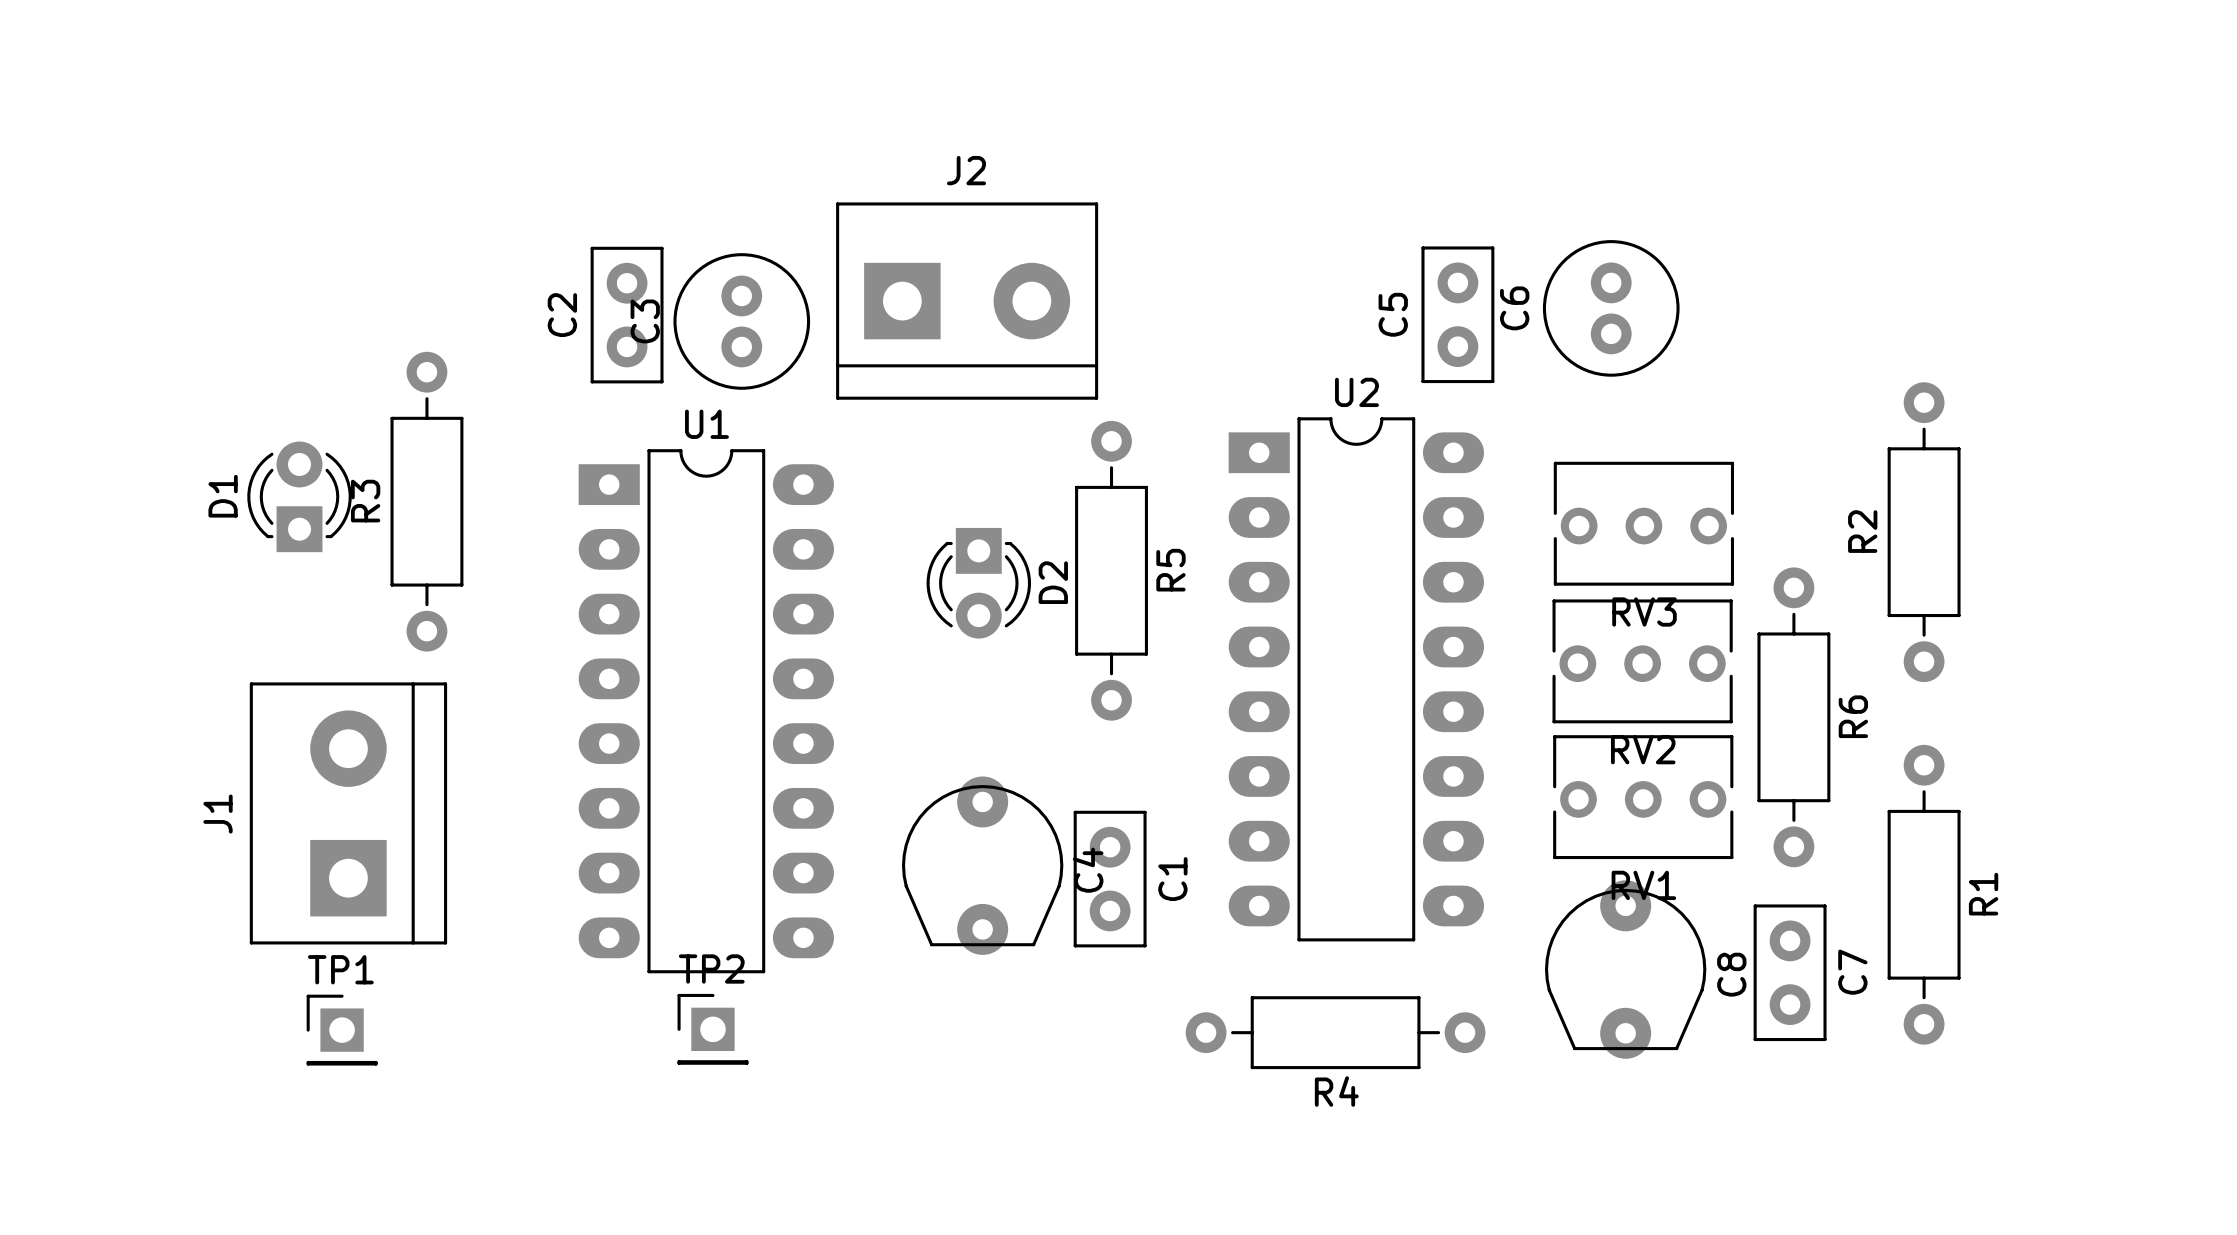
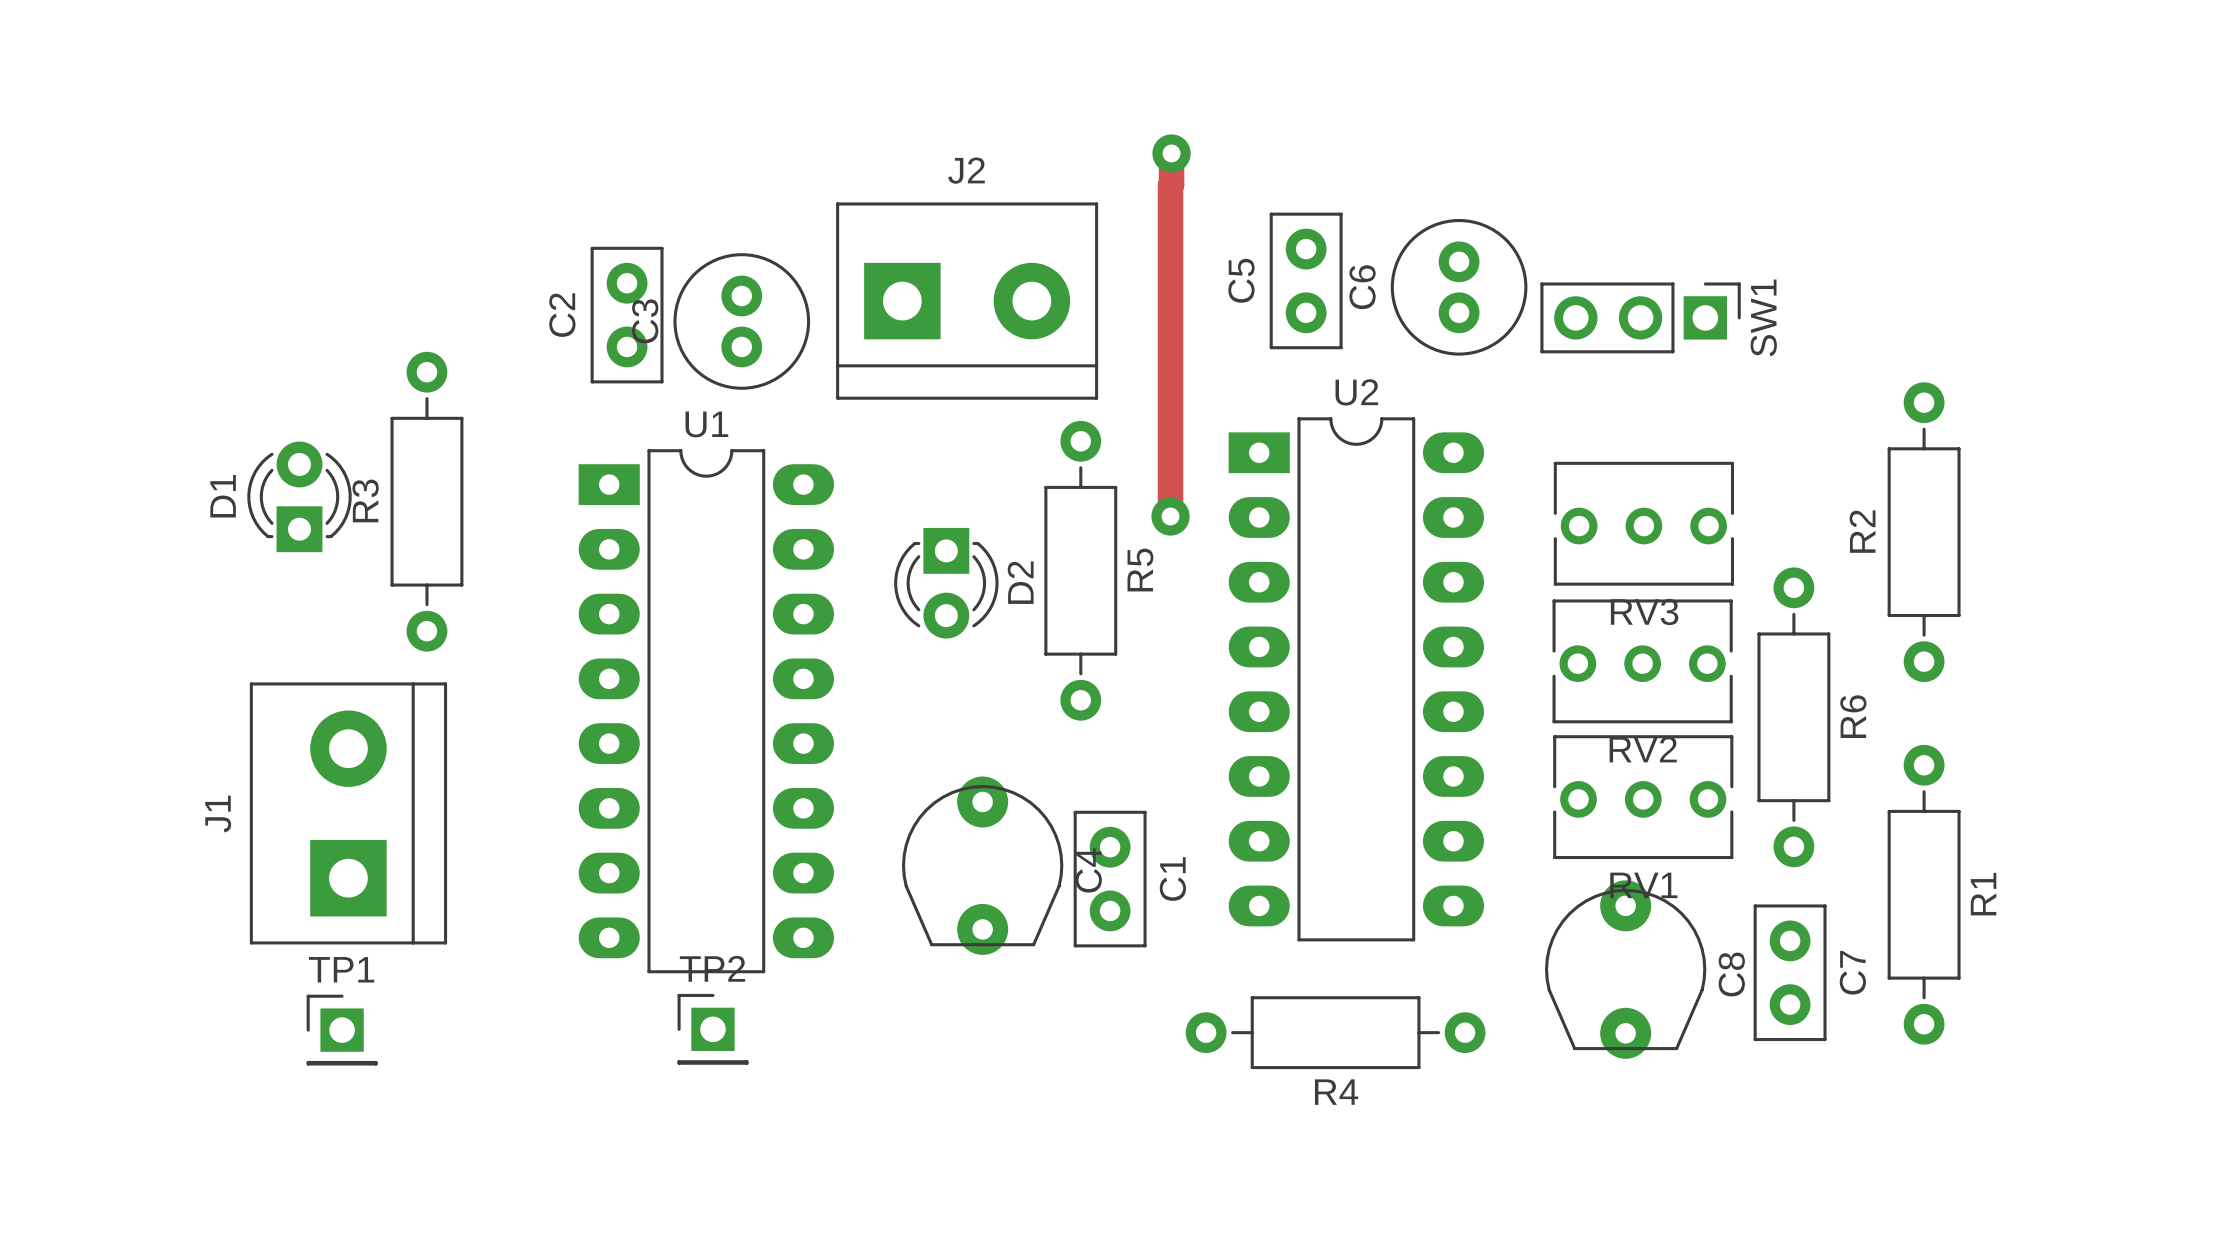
track: none -> (1171, 153) (1170, 516)
via: none -> (1171, 153)
C6 position: (1611, 308) -> (1459, 287)
C5 position: (1457, 314) -> (1306, 280)
SW1: none -> (1640, 317)
via: none -> (1170, 516)
D2 footprint: [926, 527, 1031, 639] -> [894, 527, 999, 639]
R5 position: (1111, 570) -> (1080, 570)

